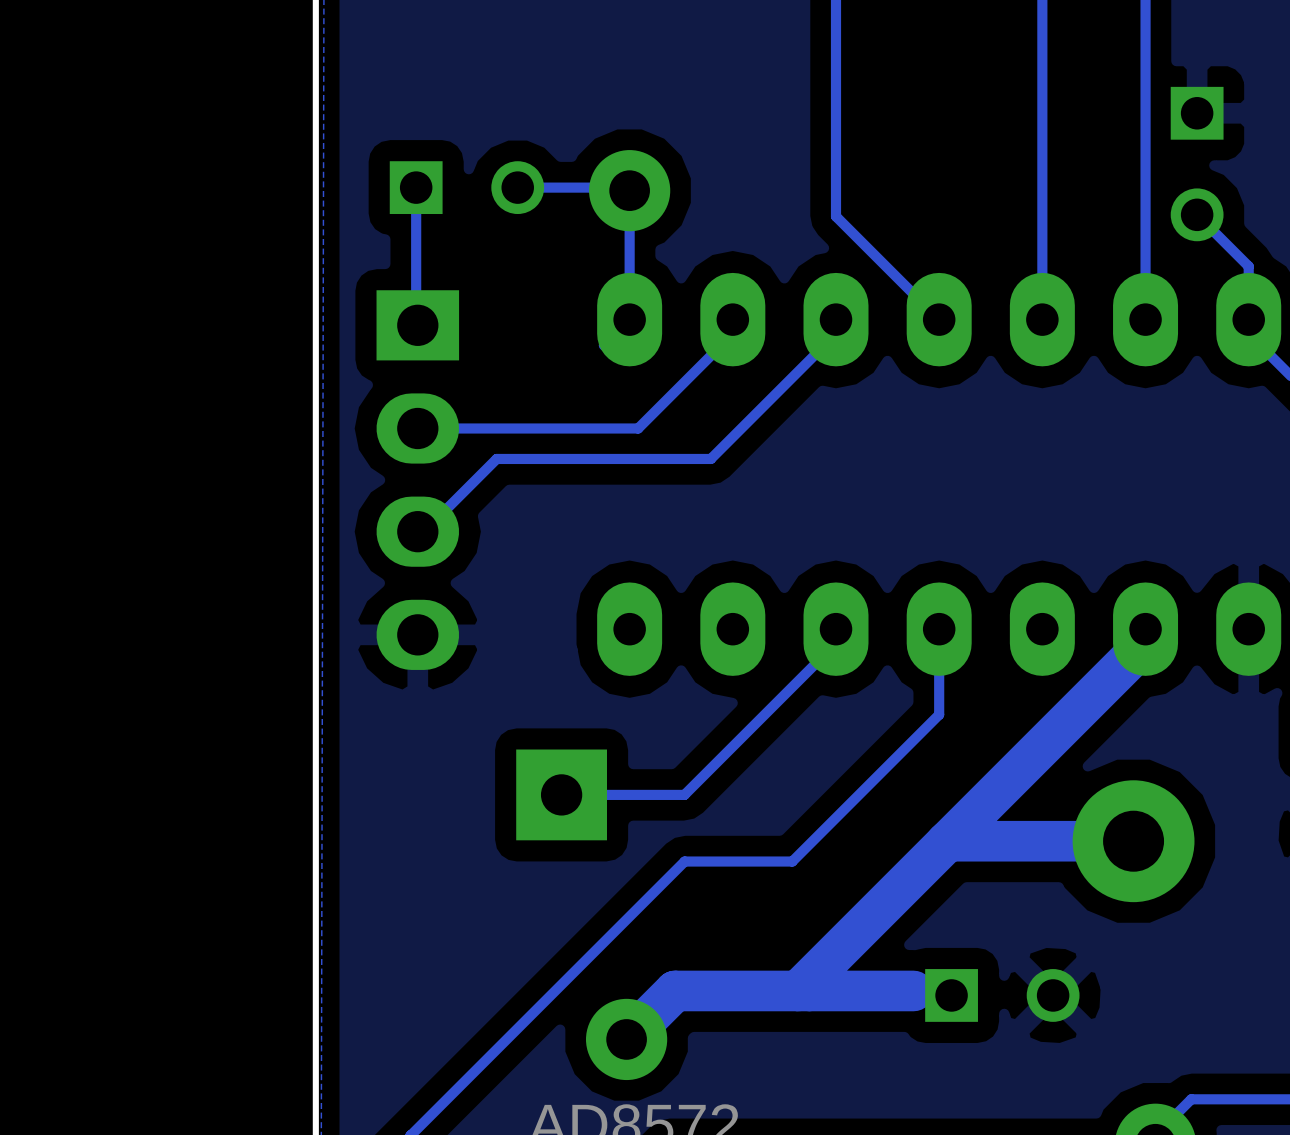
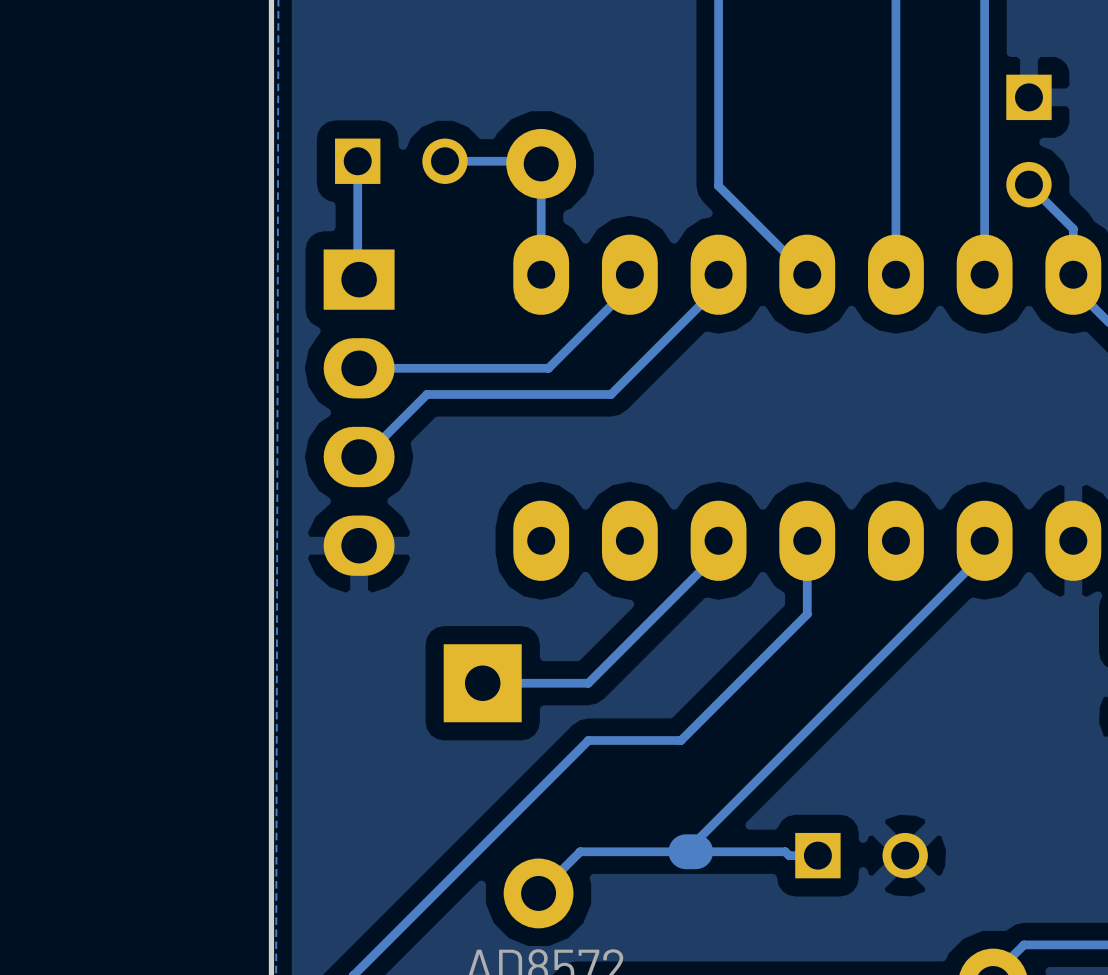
bottom track width: thick (1145, 643) (947, 841) -> thin (984, 553) (814, 723)
bottom track: (1133, 841) (947, 841) (945, 843) -> none
part: (1133, 841) -> none
bottom track width: thick (945, 843) (797, 990) (675, 990) (626, 1039) -> thin (812, 724) (685, 851) (580, 851) (538, 893)
bottom track width: thick (913, 990) (809, 990) -> thin (785, 851) (695, 851)

